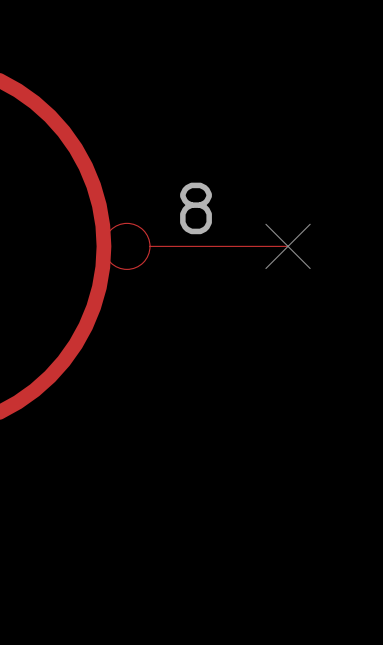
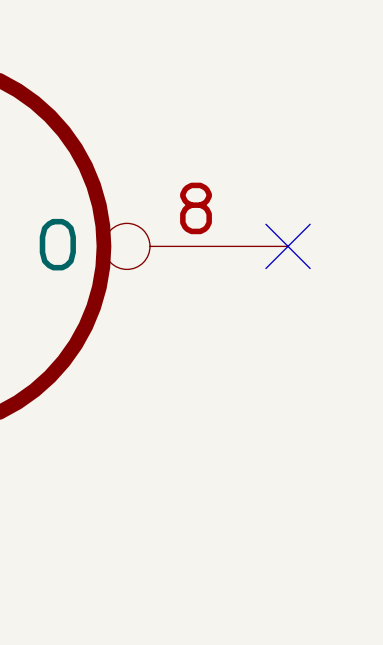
part pin name: none -> O (57, 244)

